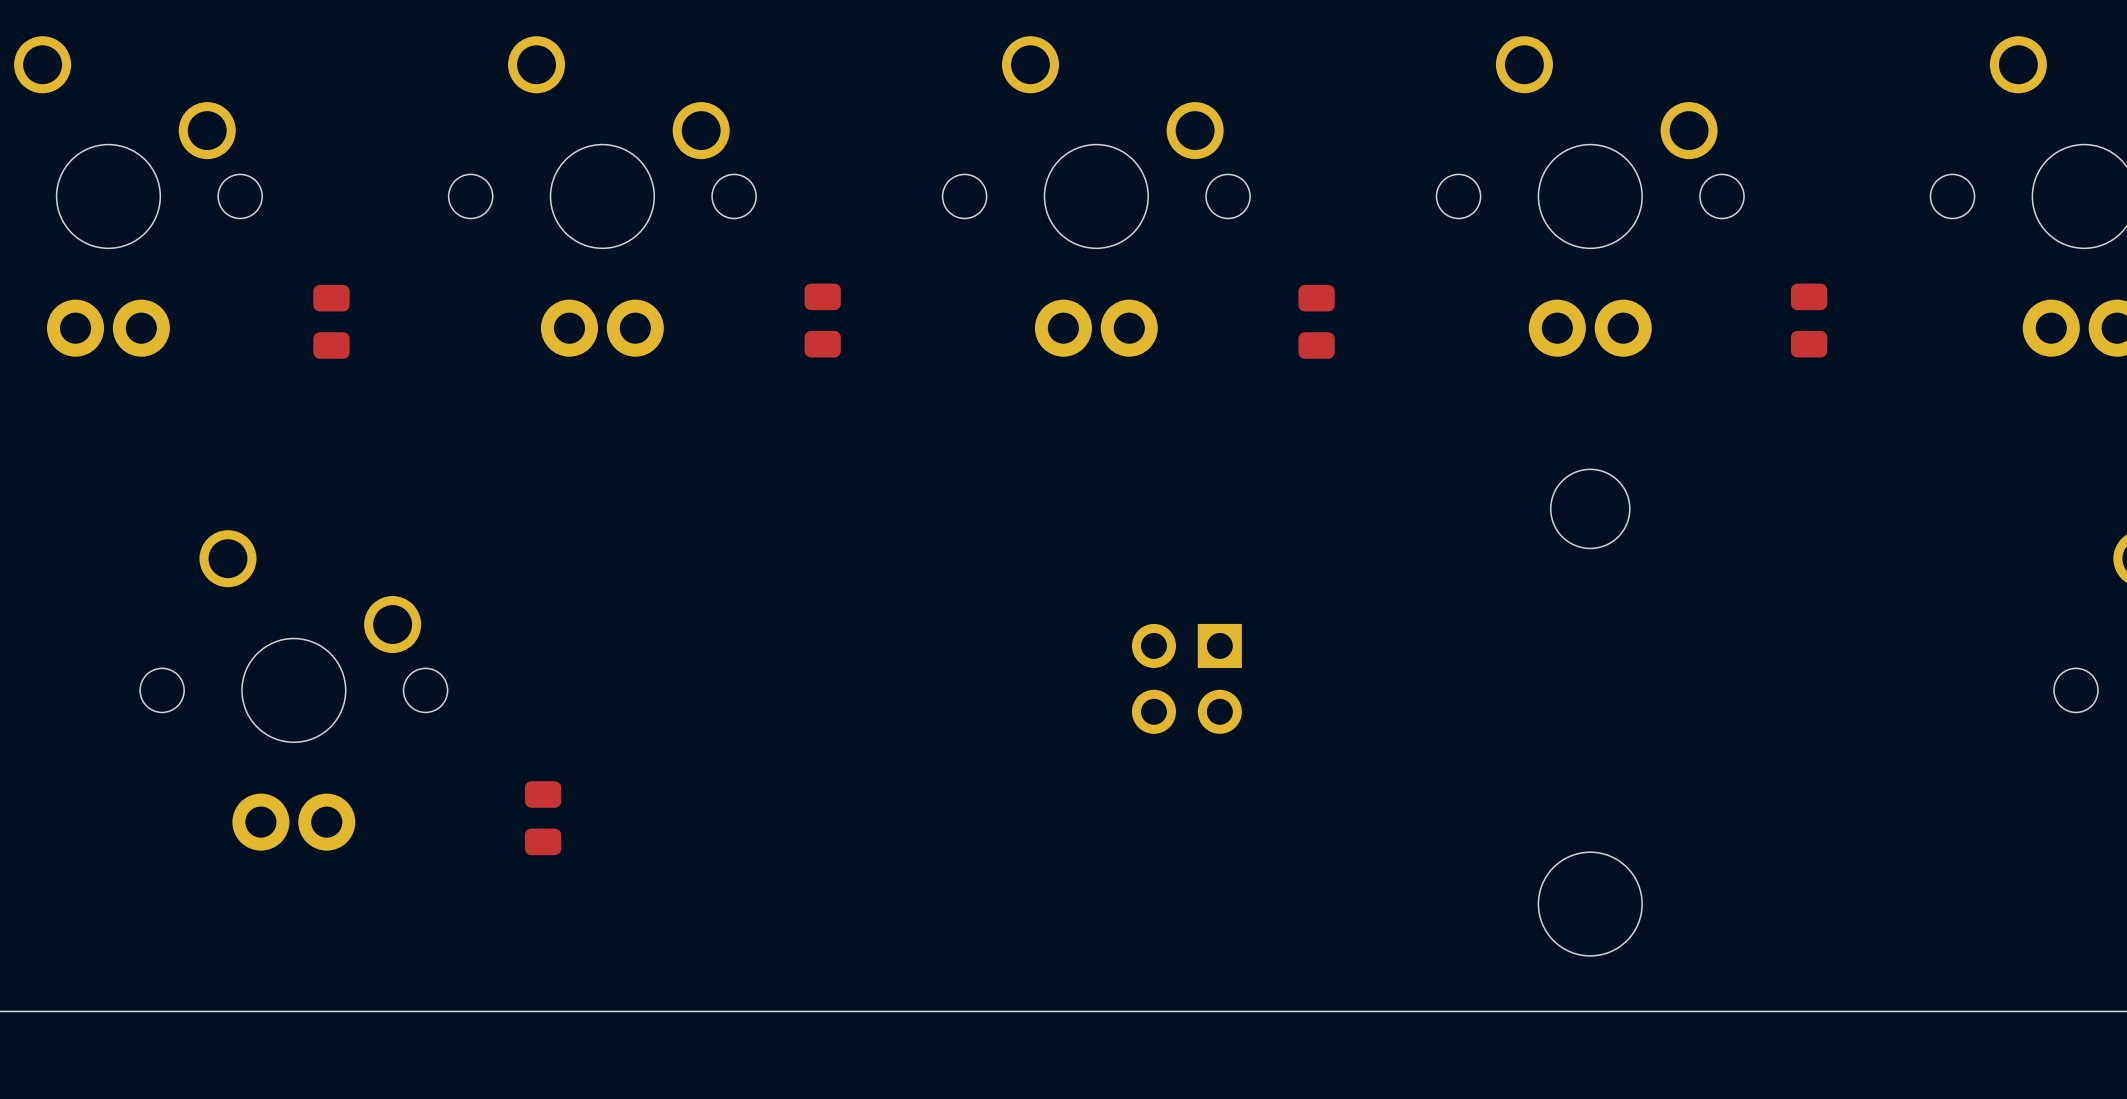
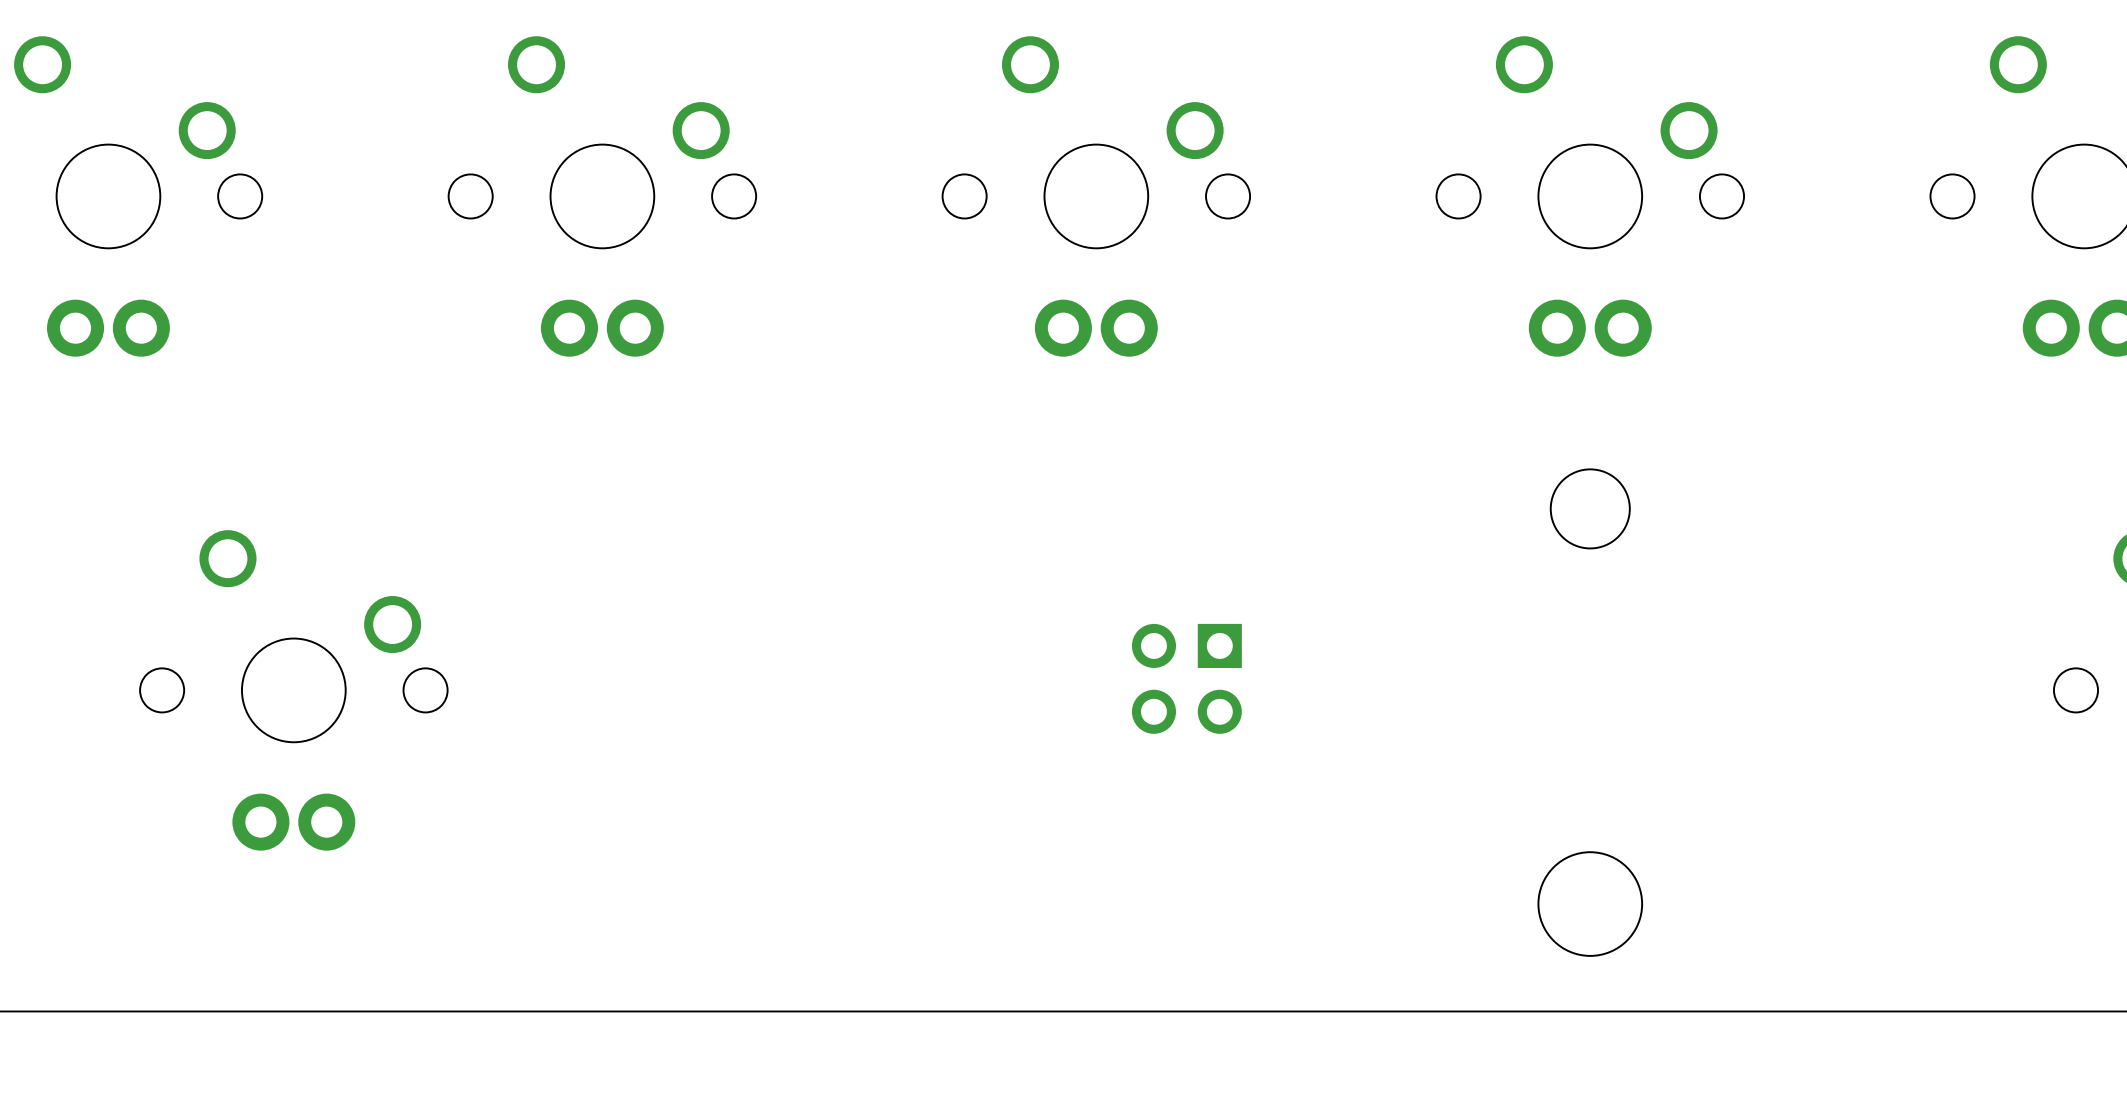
part: (822, 320) -> none
part: (1809, 320) -> none
part: (331, 321) -> none
part: (1316, 321) -> none
part: (543, 818) -> none

